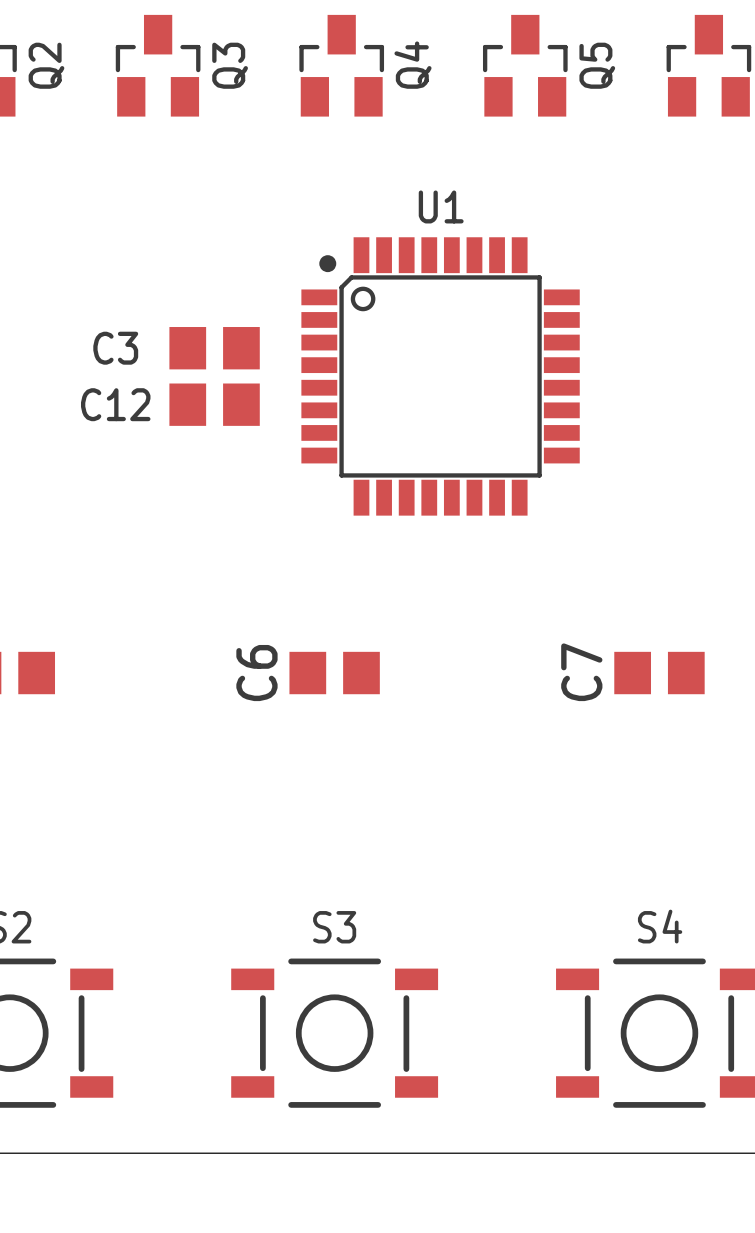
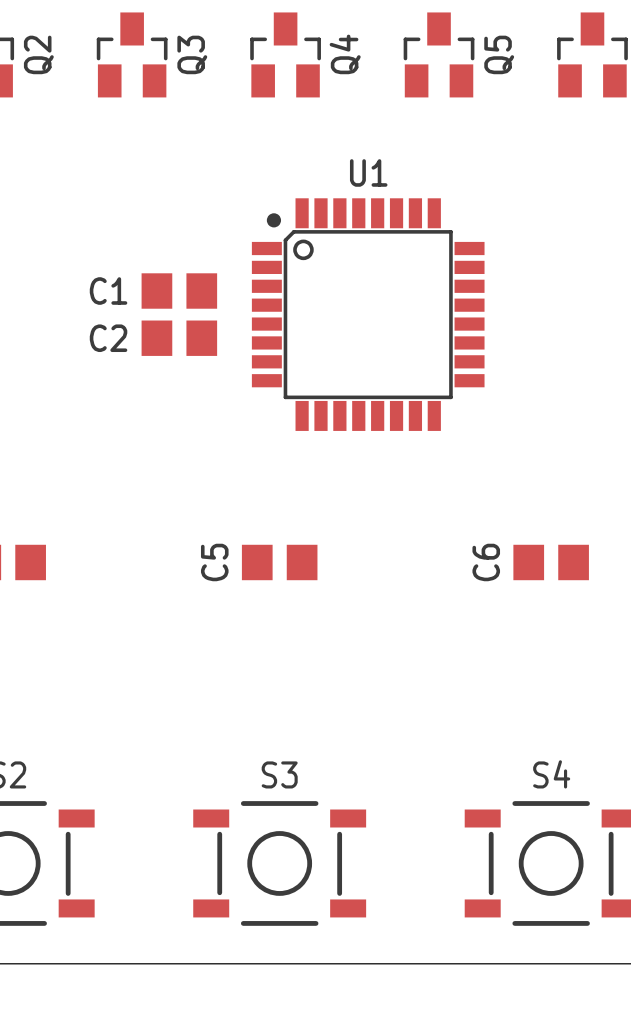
C3 name: C3 (115, 348) -> C1 (108, 291)
C12 name: C12 (115, 404) -> C2 (108, 338)
C7 name: C7 (581, 672) -> C6 (486, 562)
C6 name: C6 (256, 673) -> C5 (214, 562)

